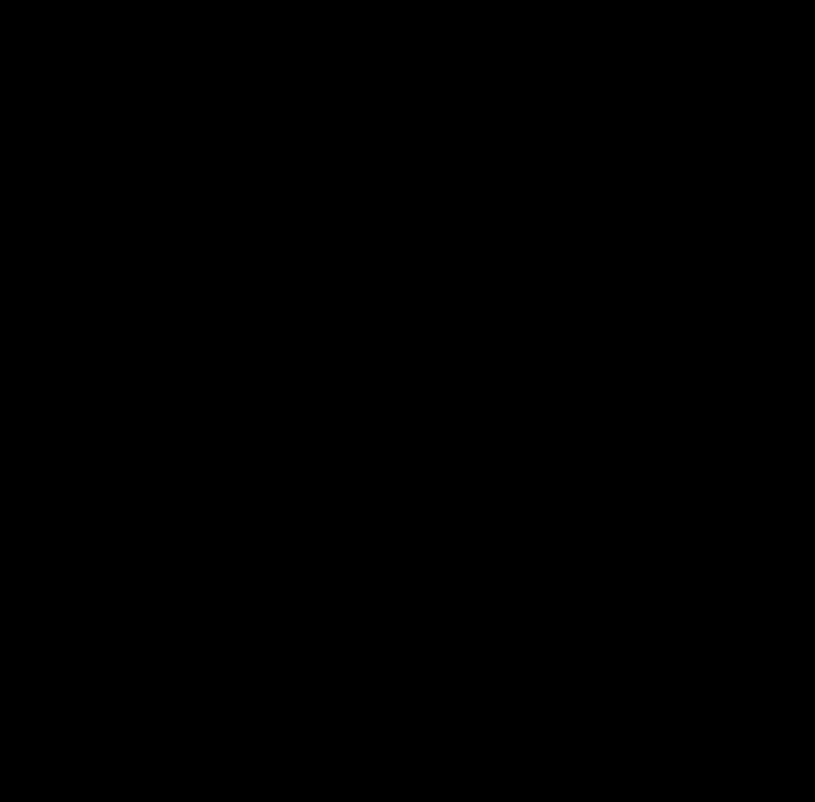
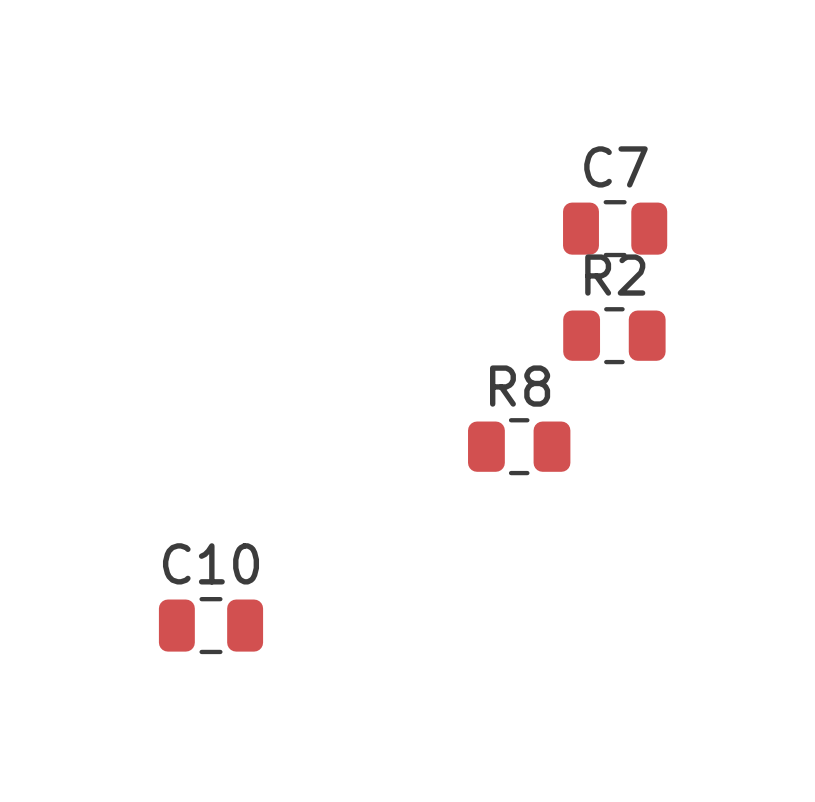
C7: none -> (615, 228)
R2: none -> (614, 335)
R8: none -> (519, 446)
C10: none -> (210, 625)

